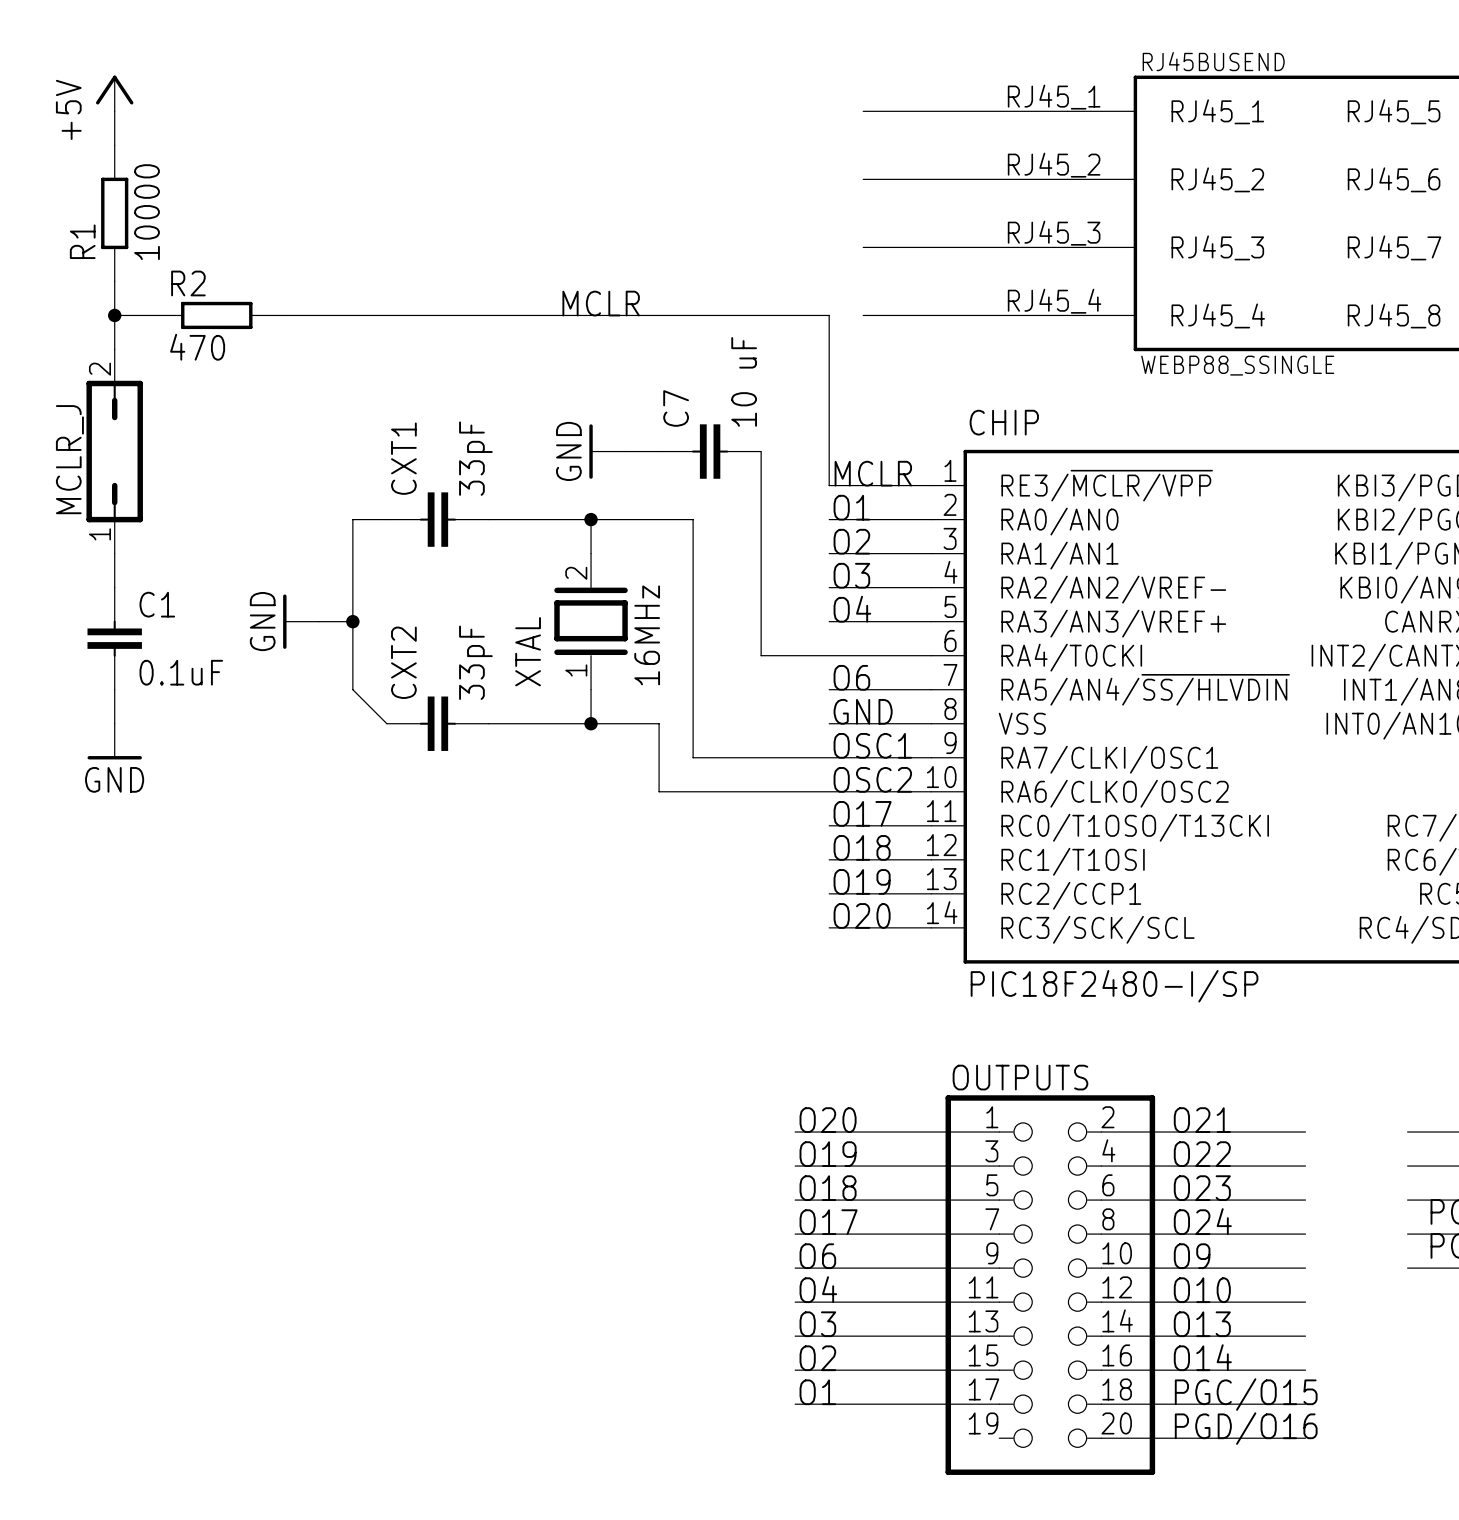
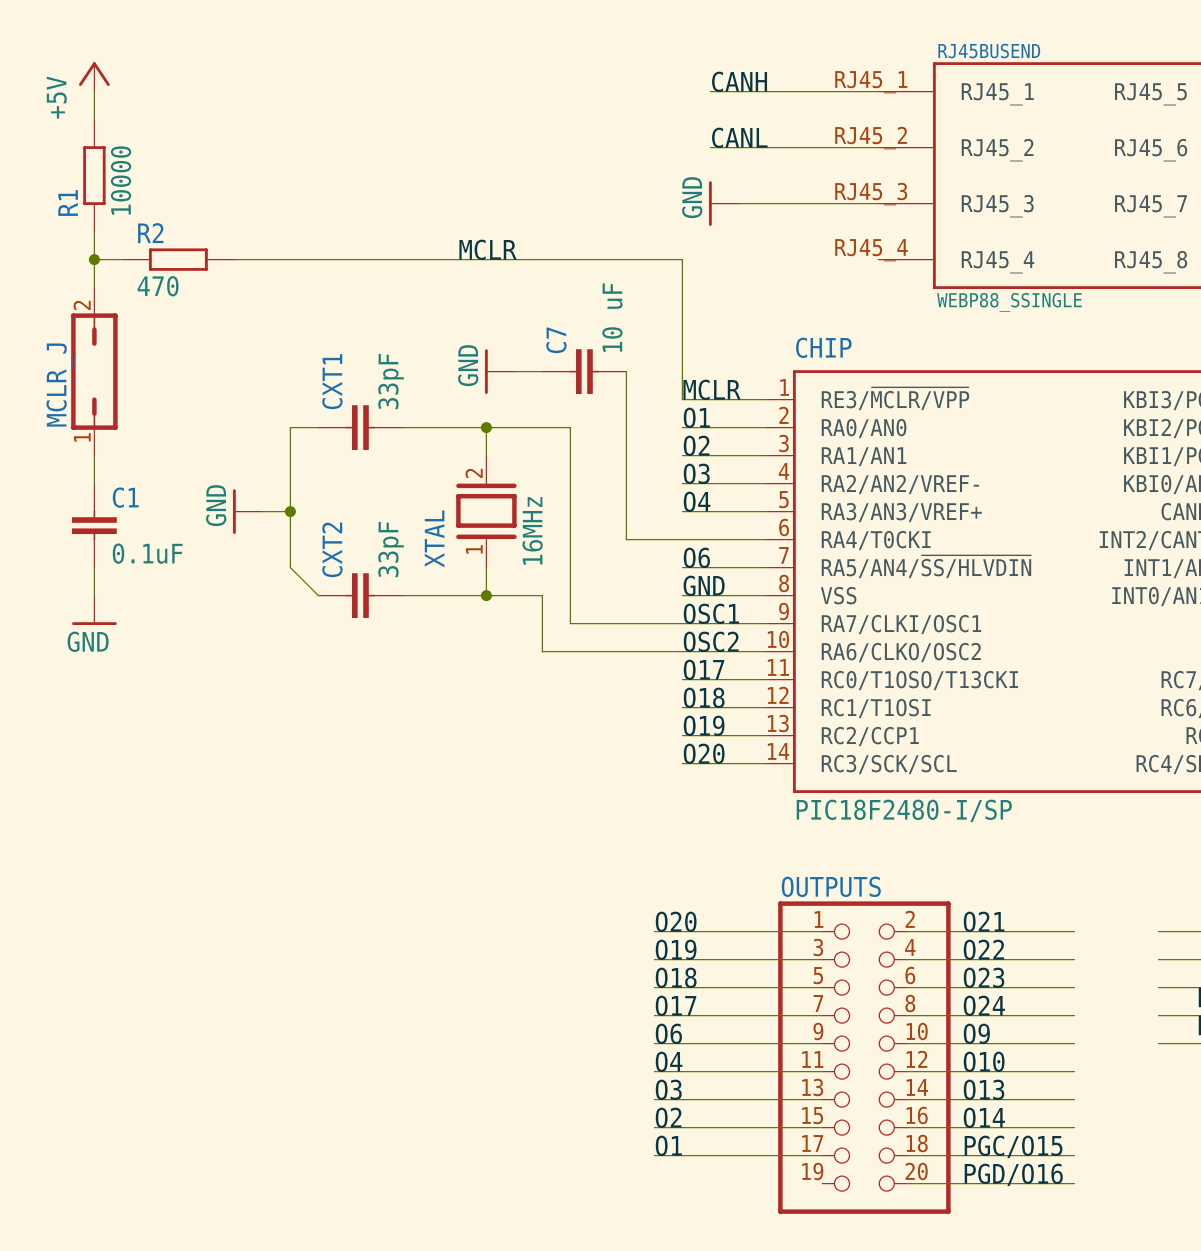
label: none -> CANH (739, 81)
label: none -> CANL (739, 137)
power symbol: none -> GND (723, 203)
wire: (863, 315) (1067, 315) -> none

